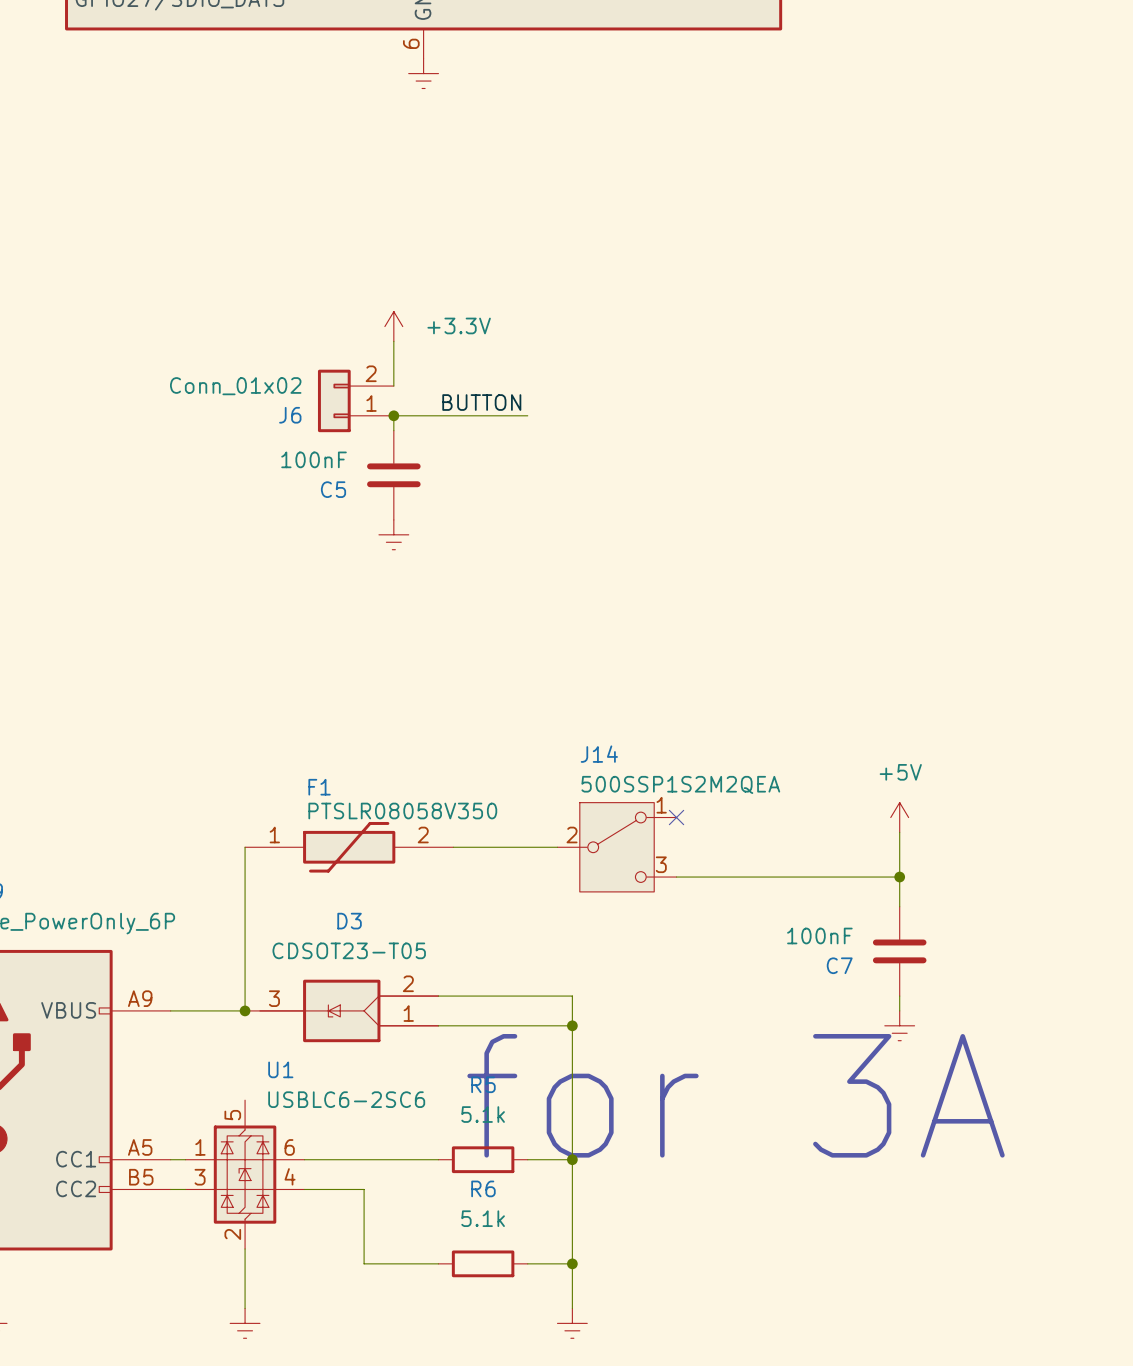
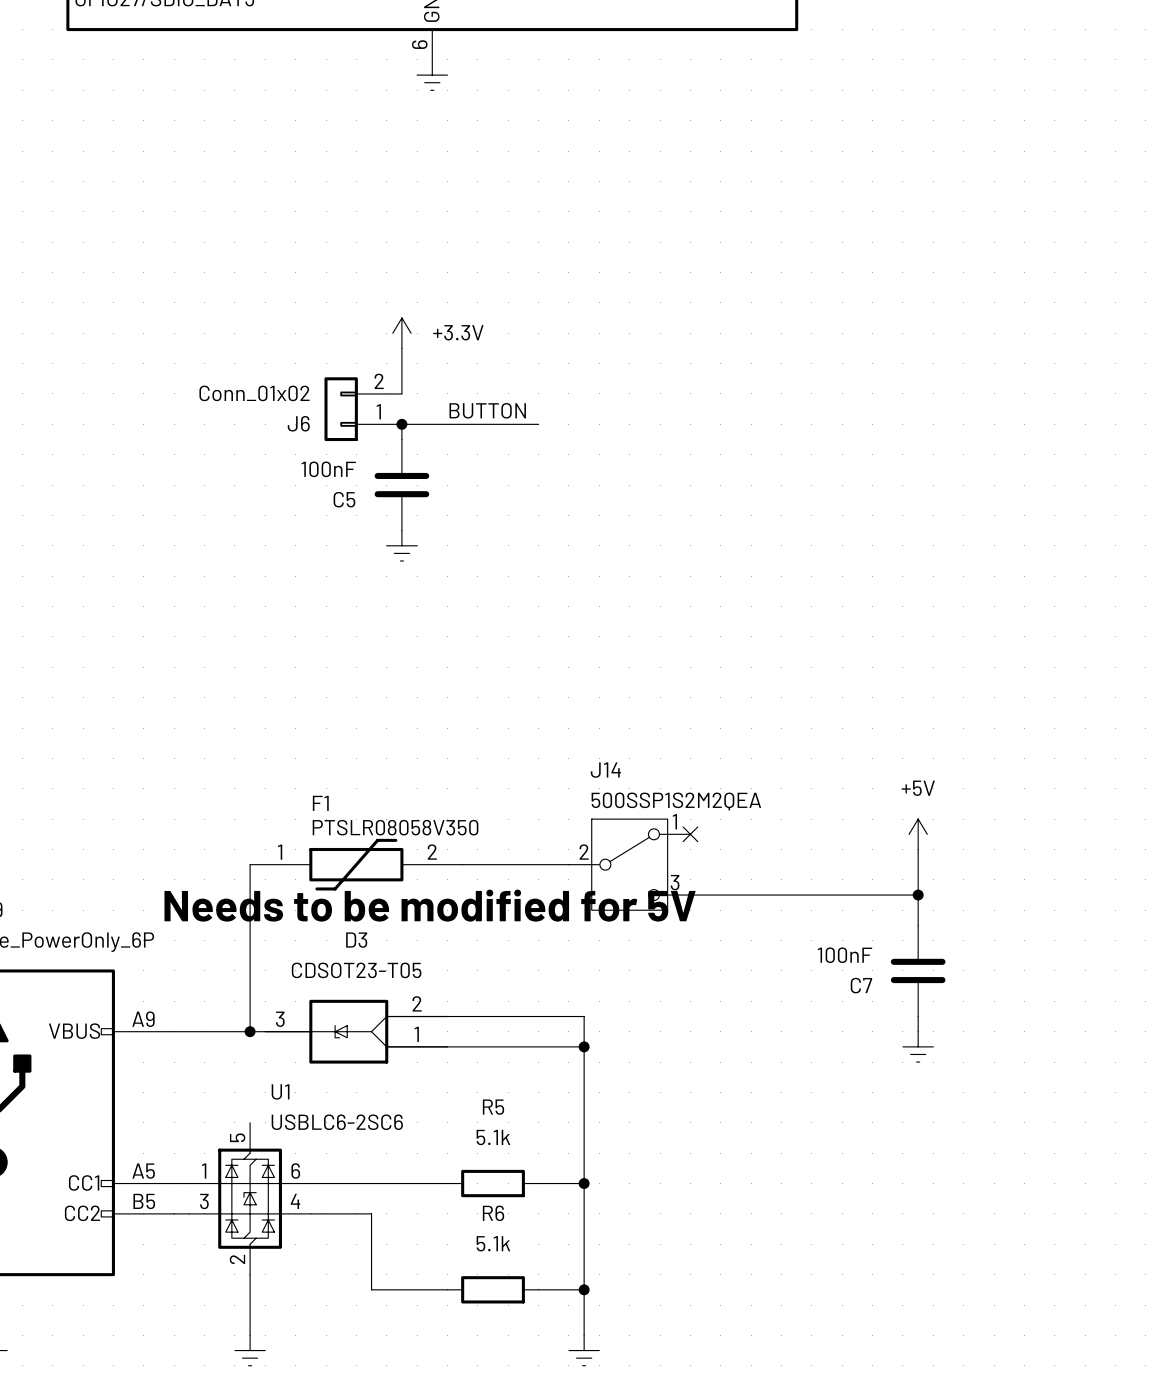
text: none -> Needs to be modified for 5V (430, 905)
text: for 3A (736, 1095) -> none

